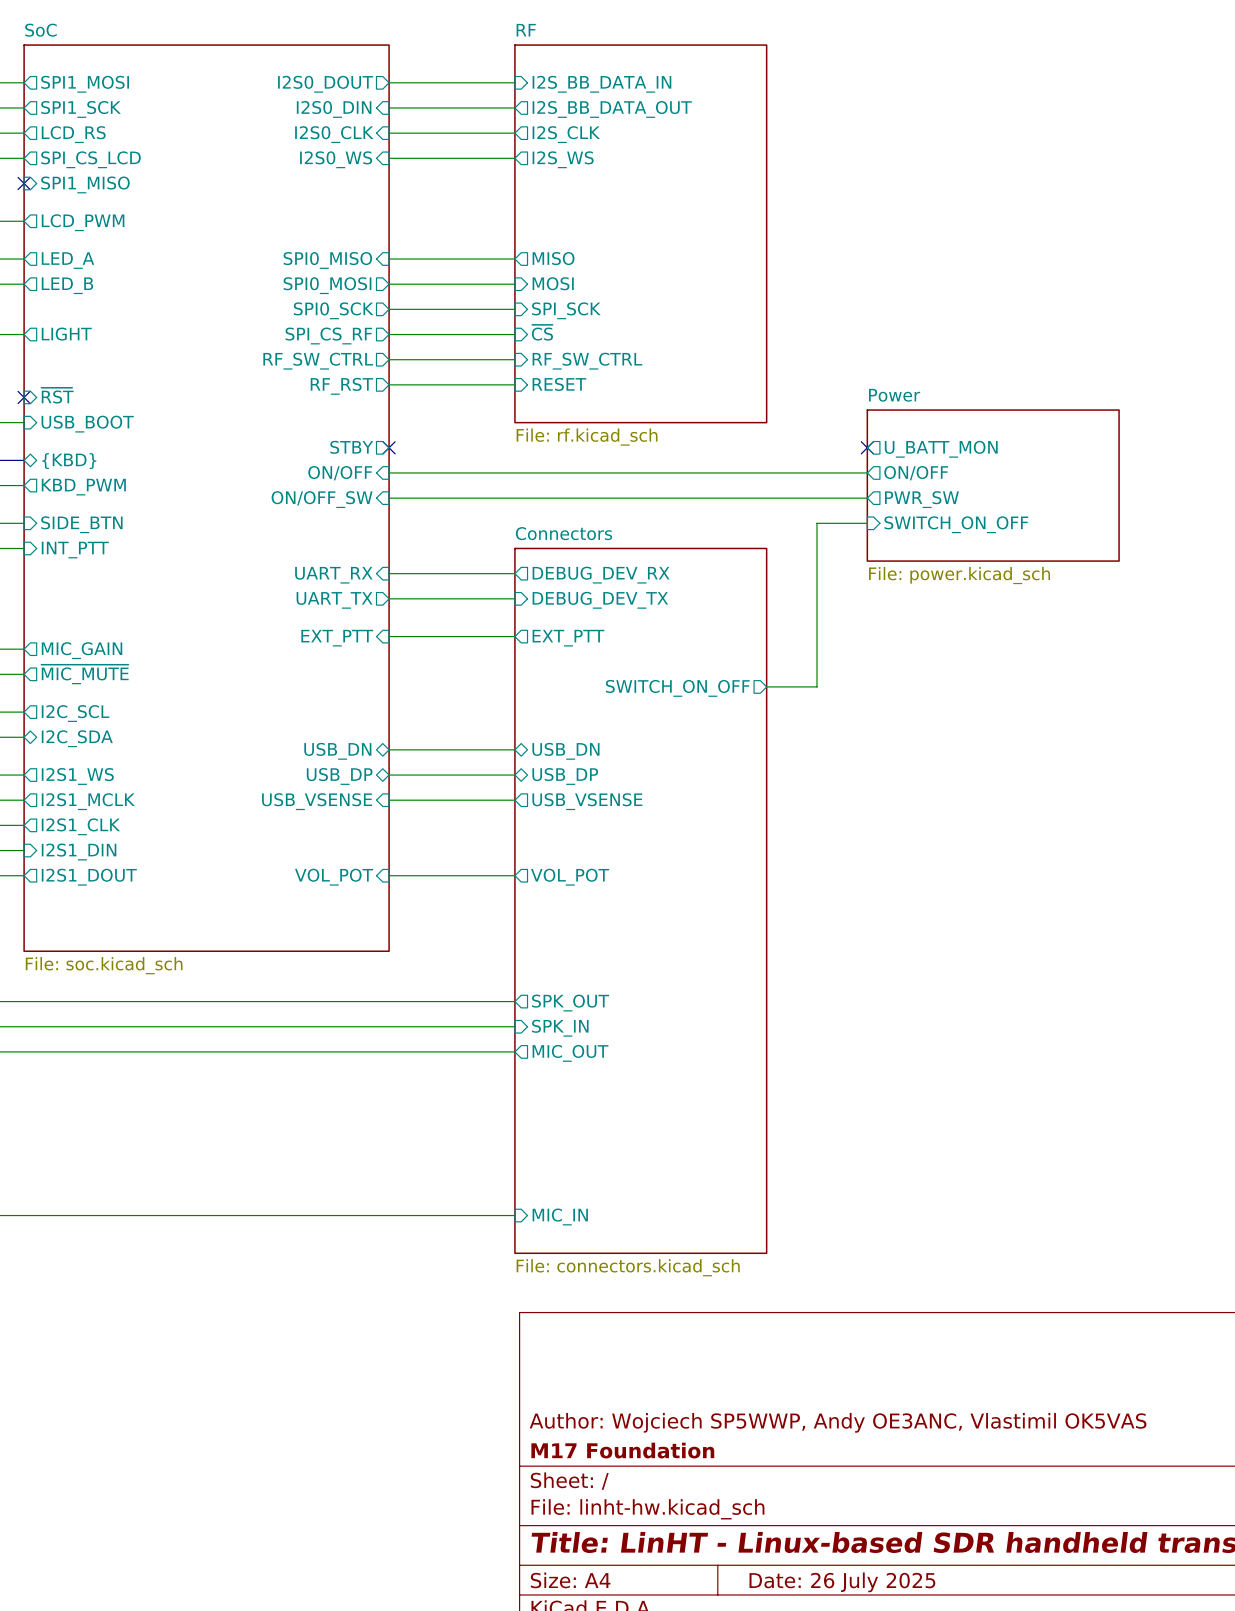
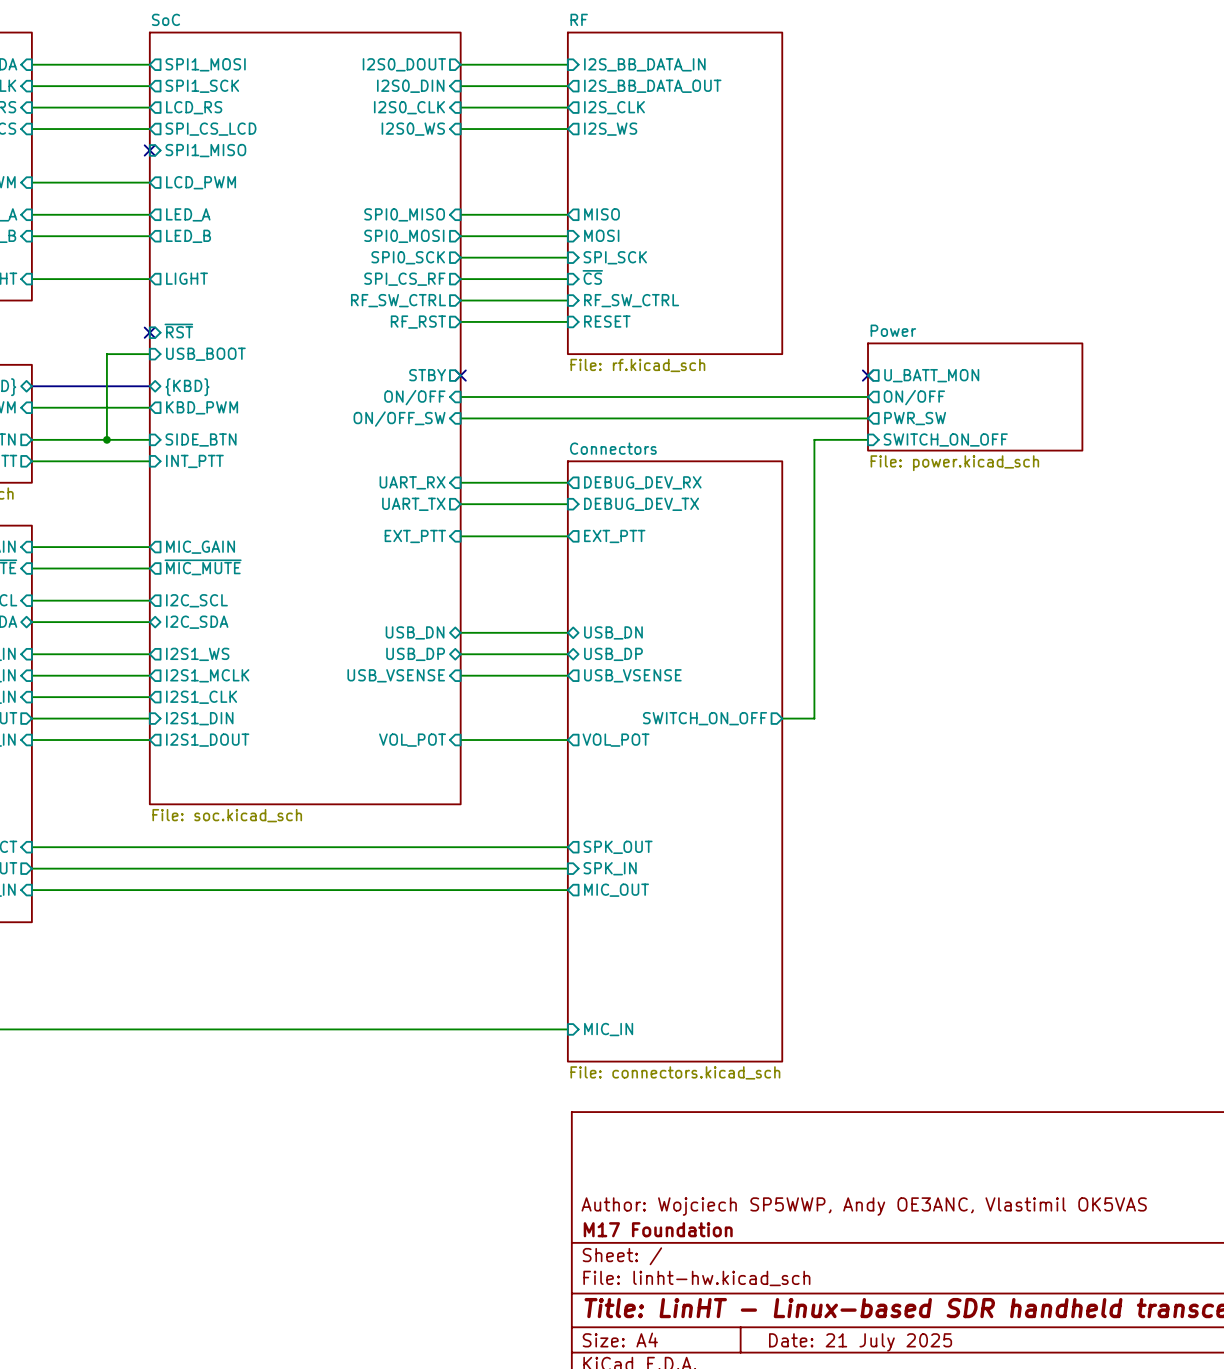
sheet Power: none -> File: power.kicad_sch (975, 397)
sheet Power: File: power.kicad_sch (993, 485) -> none
wire: (816, 523) (816, 686) (766, 686) -> (825, 439) (814, 439) (814, 718) (782, 718)
sheet pin position: SWITCH_ON_OFF (677, 688) -> SWITCH_ON_OFF (705, 718)
title block: Date: 26 July 2025 (842, 1582) -> Date: 21 July 2025 (860, 1342)

